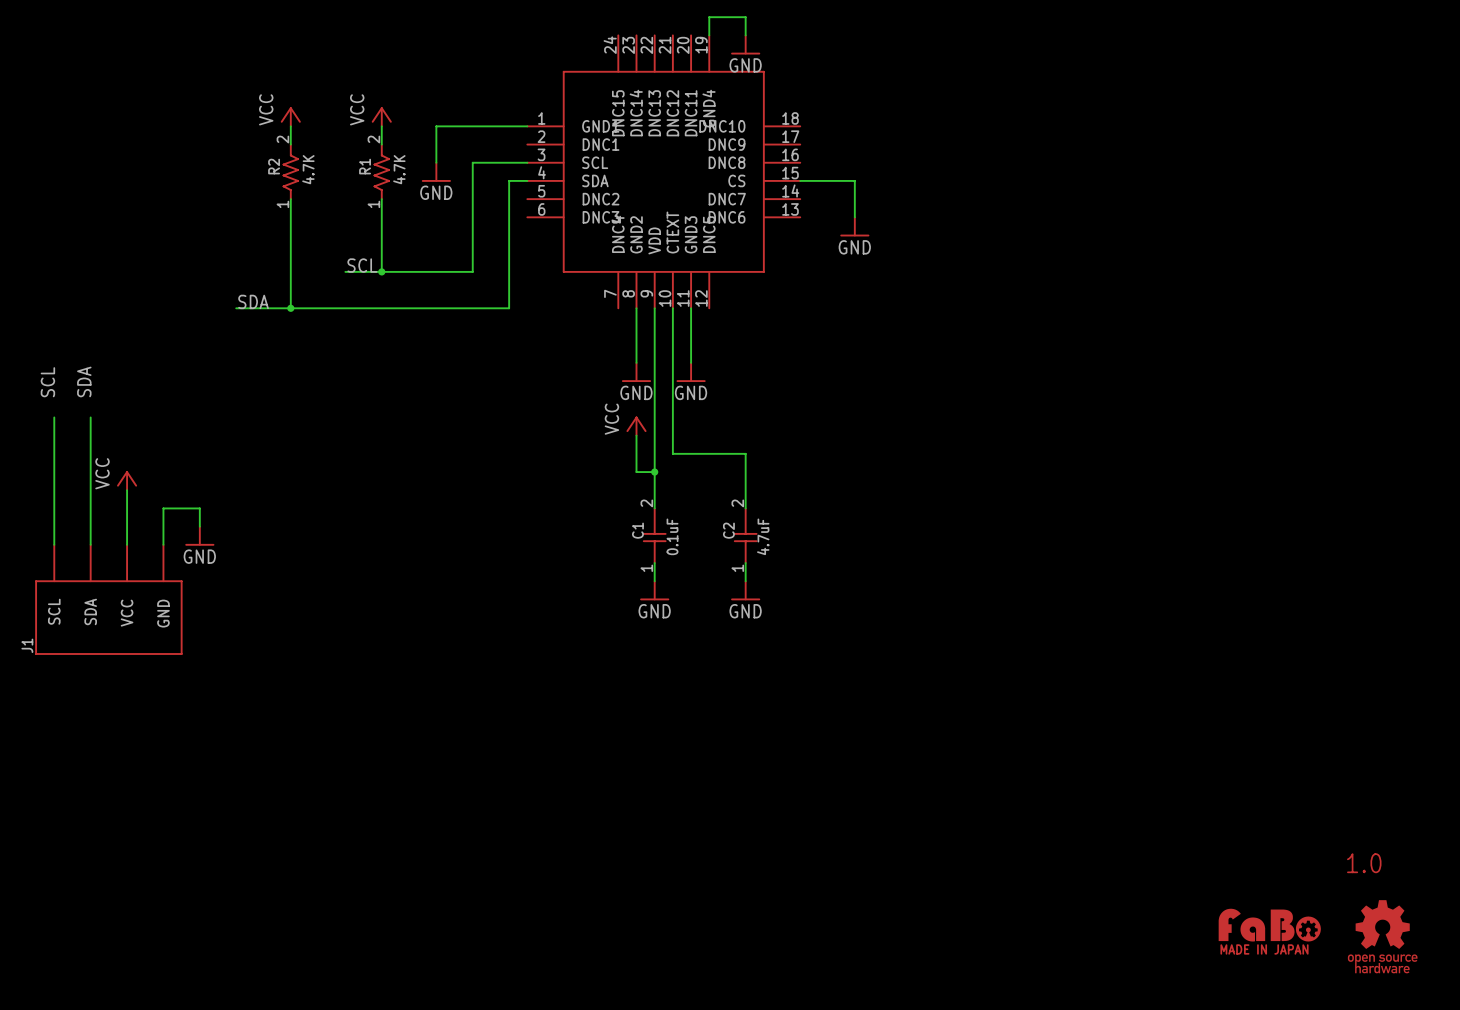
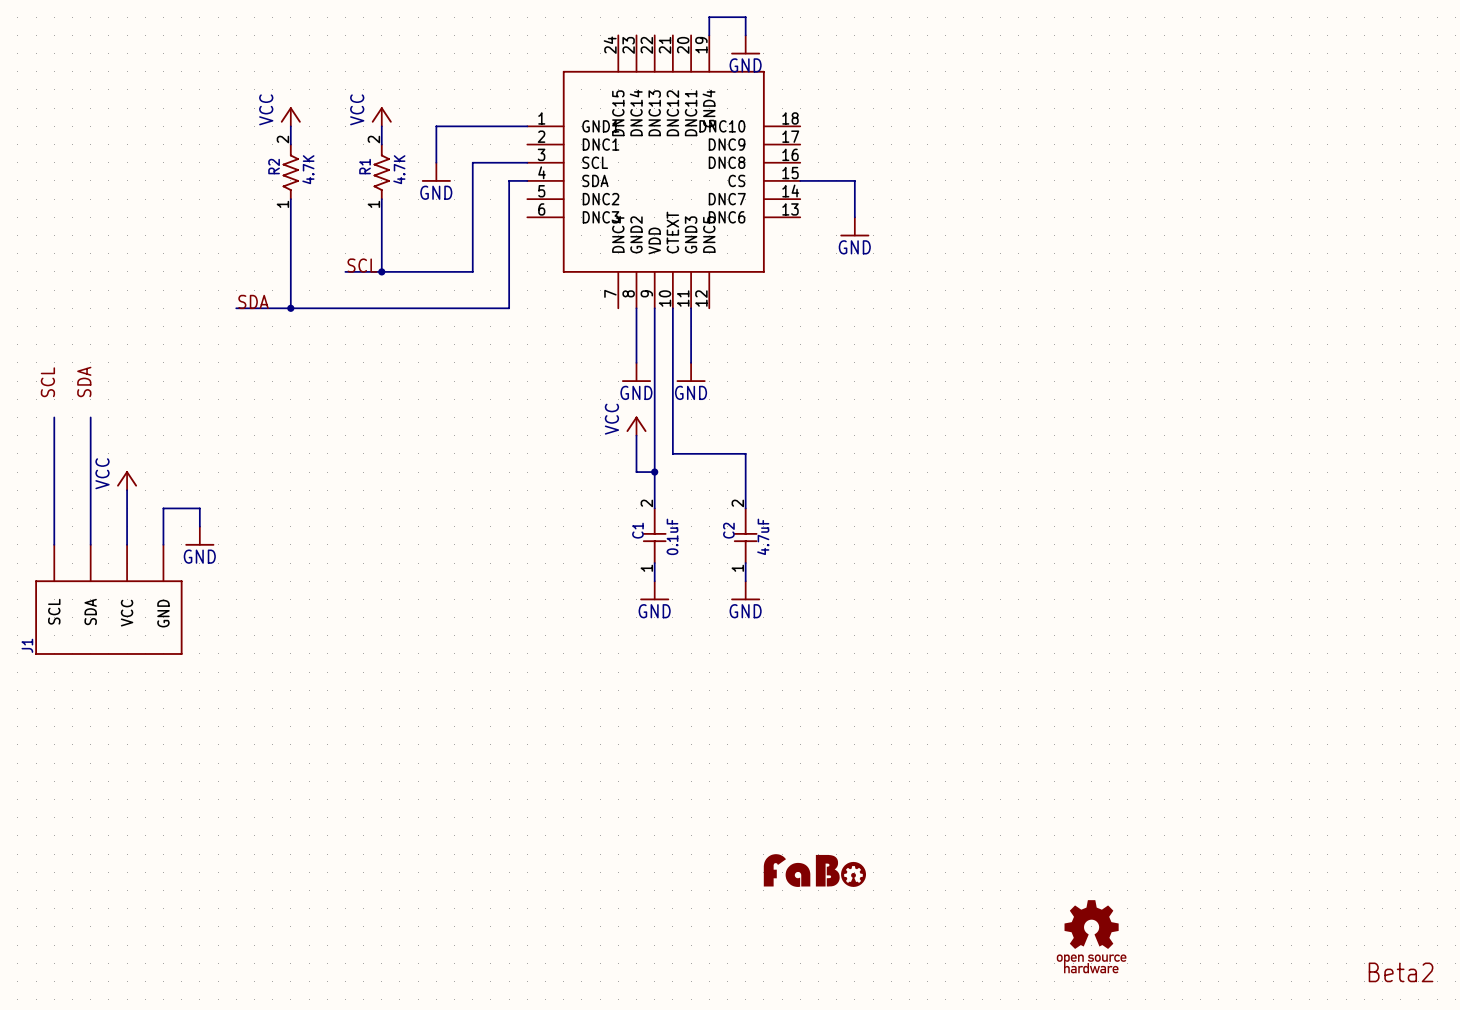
text: 1.0 (1364, 863) -> none
part: none -> (814, 870)
part: (1269, 925) -> none
part: none -> (1091, 936)
part: (1382, 936) -> none
text: none -> Beta2 (1401, 972)

